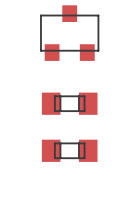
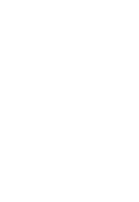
part: (69, 33) -> none
part: (69, 103) -> none
part: (69, 150) -> none

